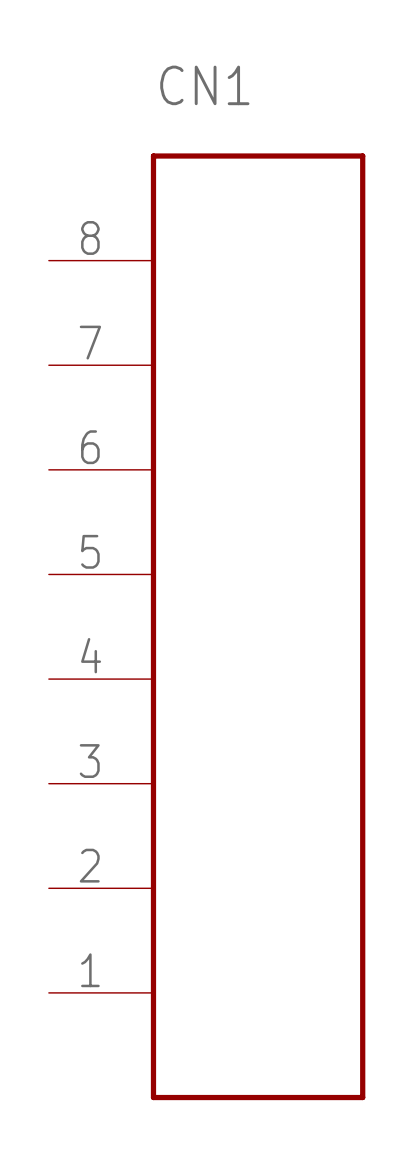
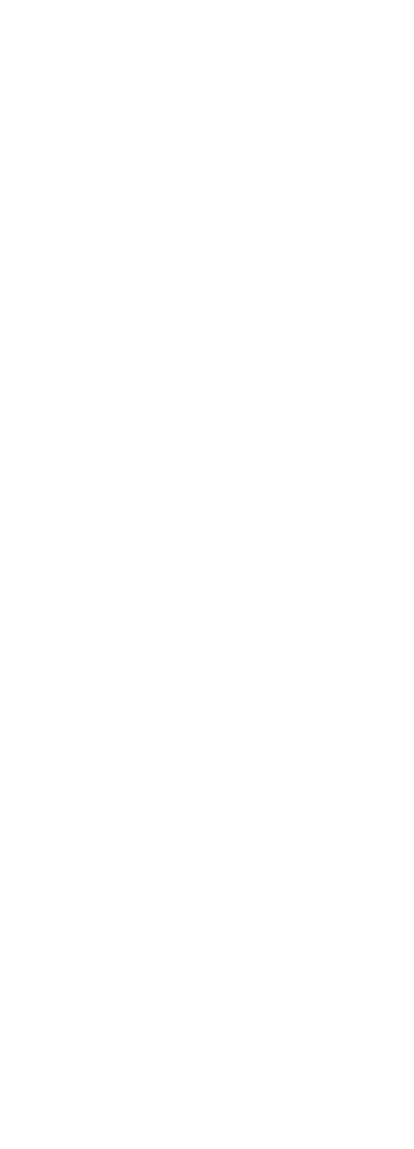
CN1: (207, 626) -> none

